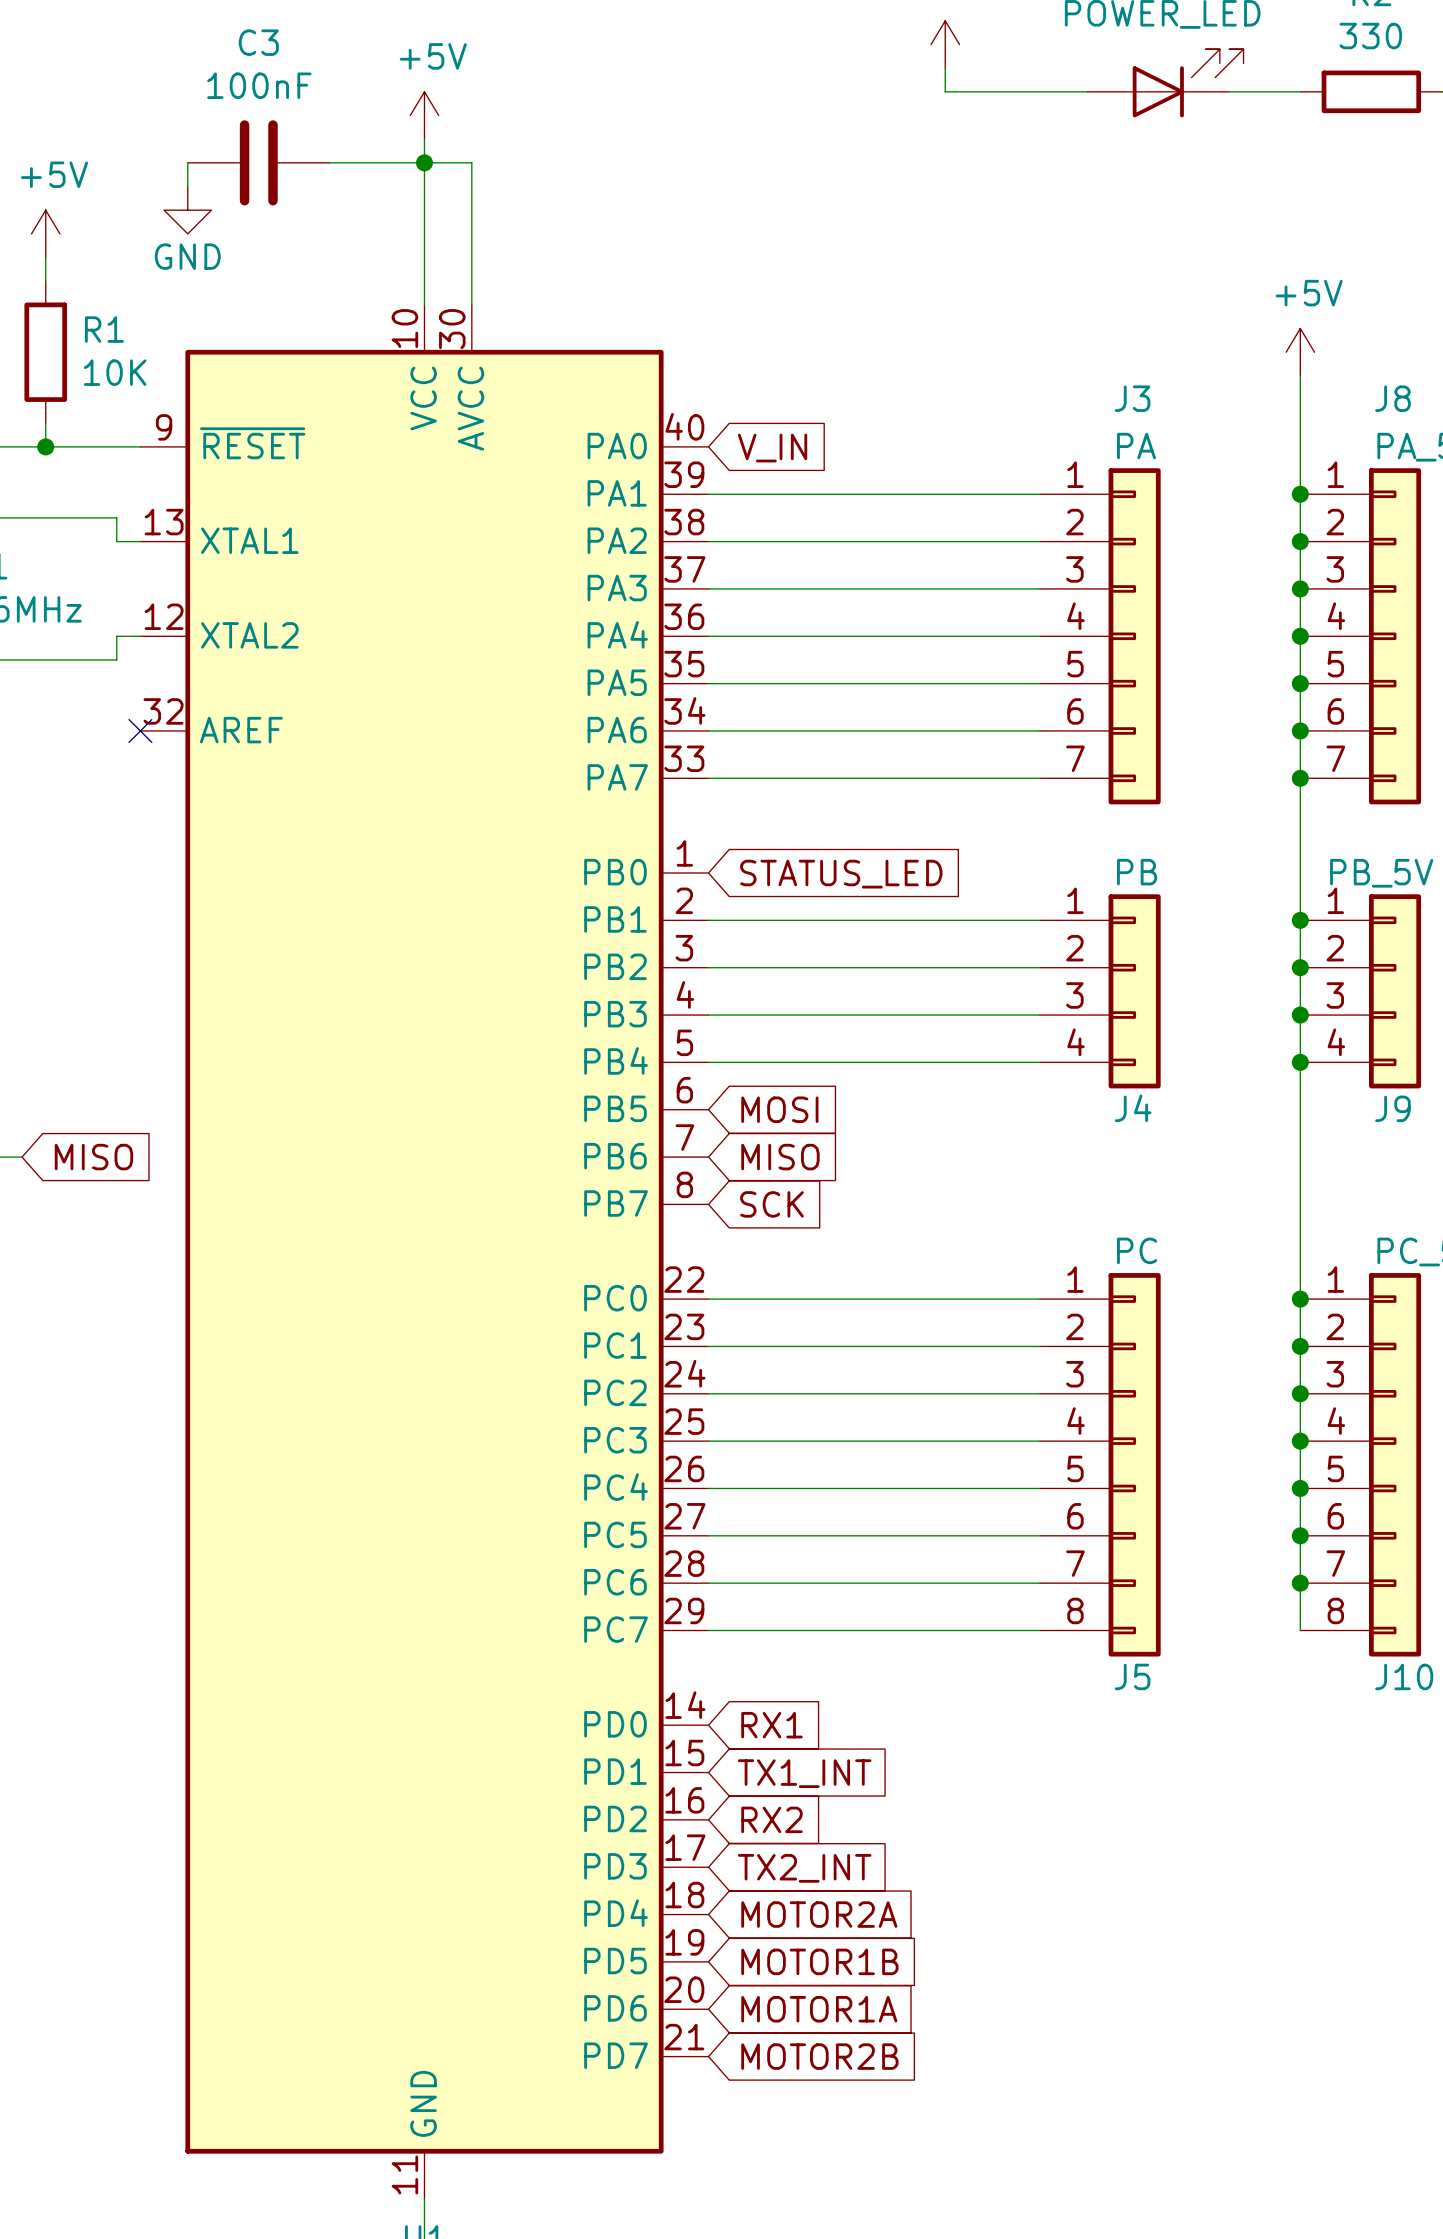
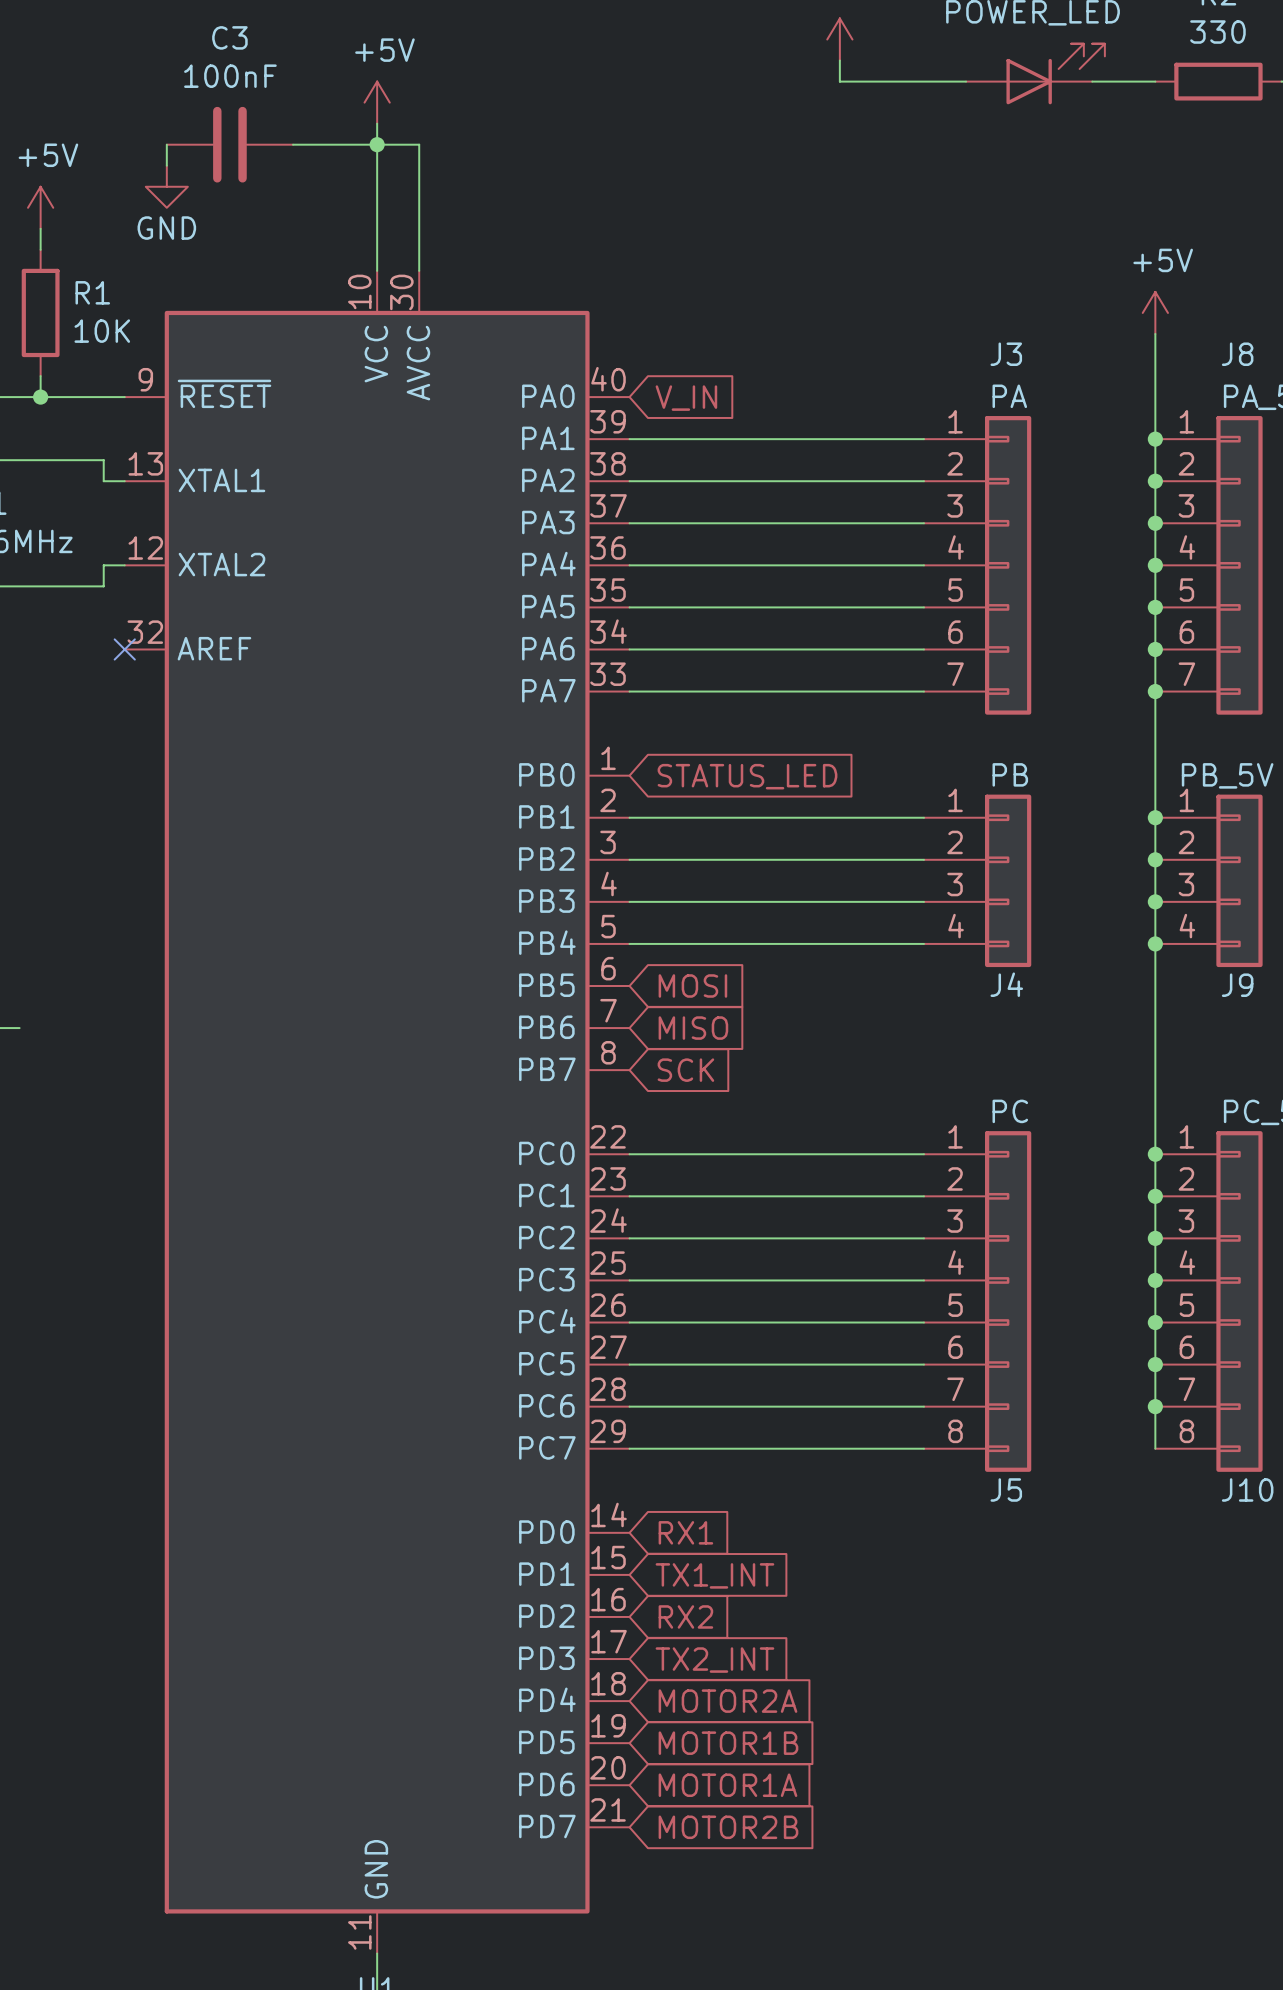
global label: MISO (93, 1157) -> none

